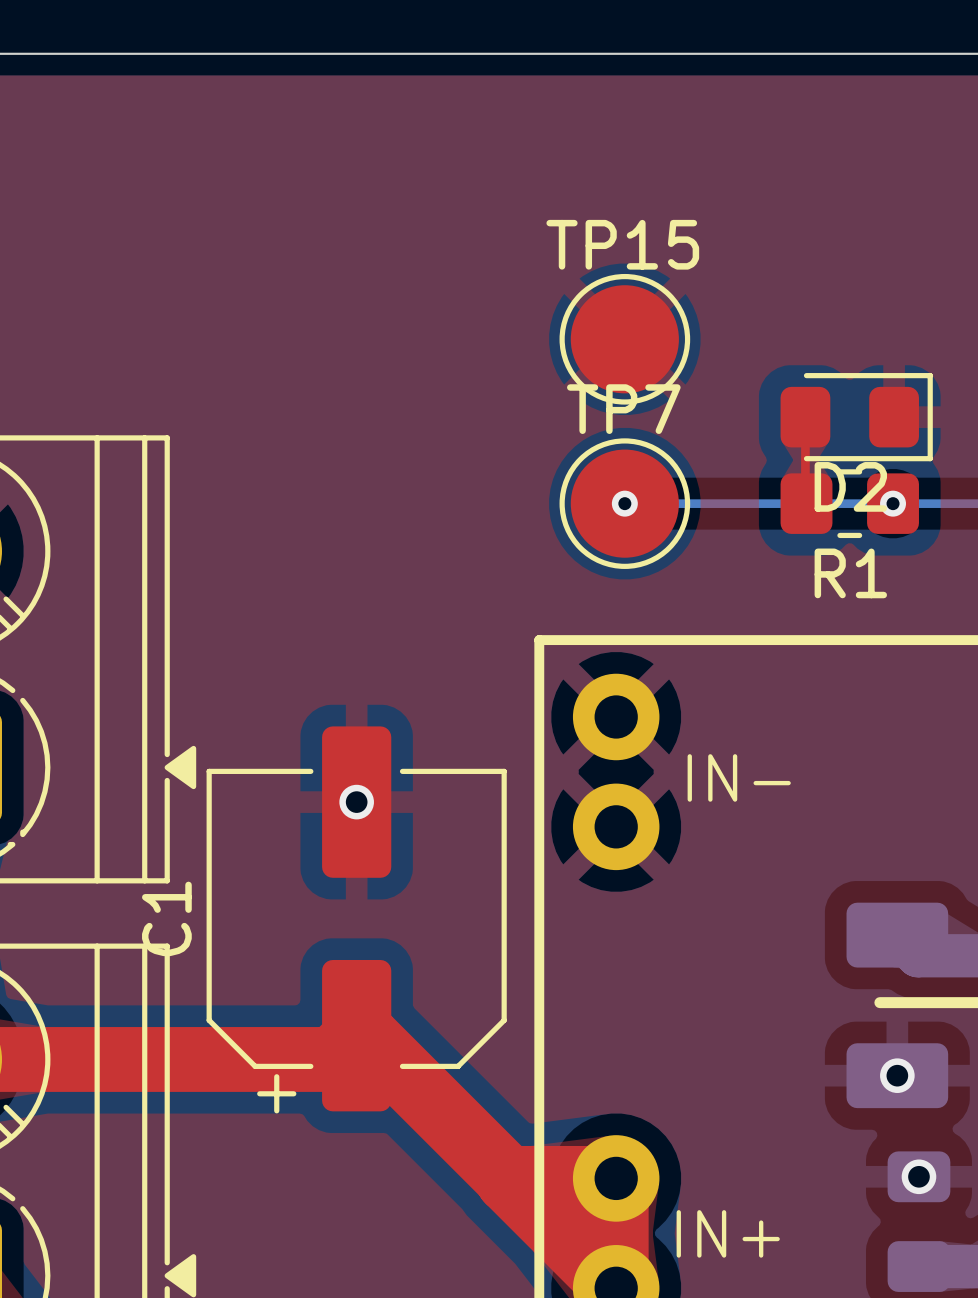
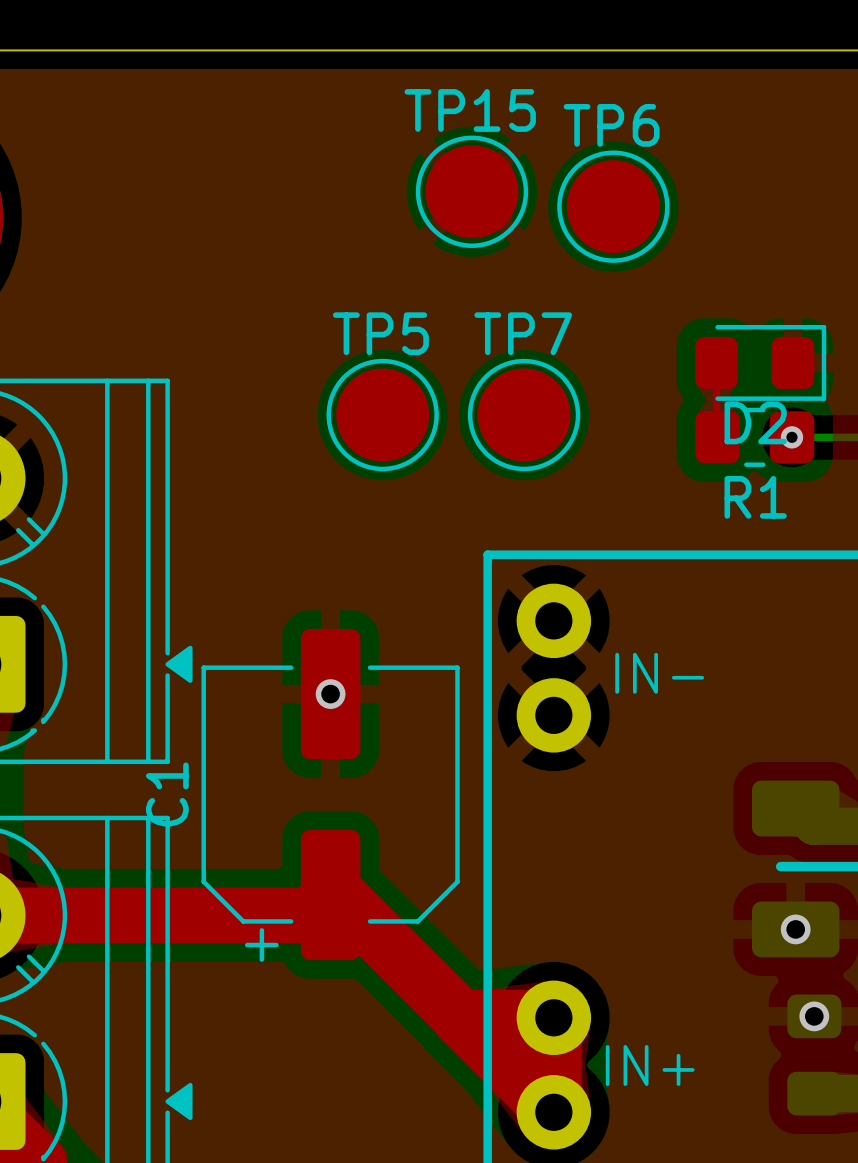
TP6: none -> (613, 206)
TP15 position: (624, 339) -> (471, 191)
TP5: none -> (382, 415)
bottom track: (624, 503) (893, 503) -> none
TP7 position: (624, 503) -> (524, 415)
via: (624, 503) -> none

